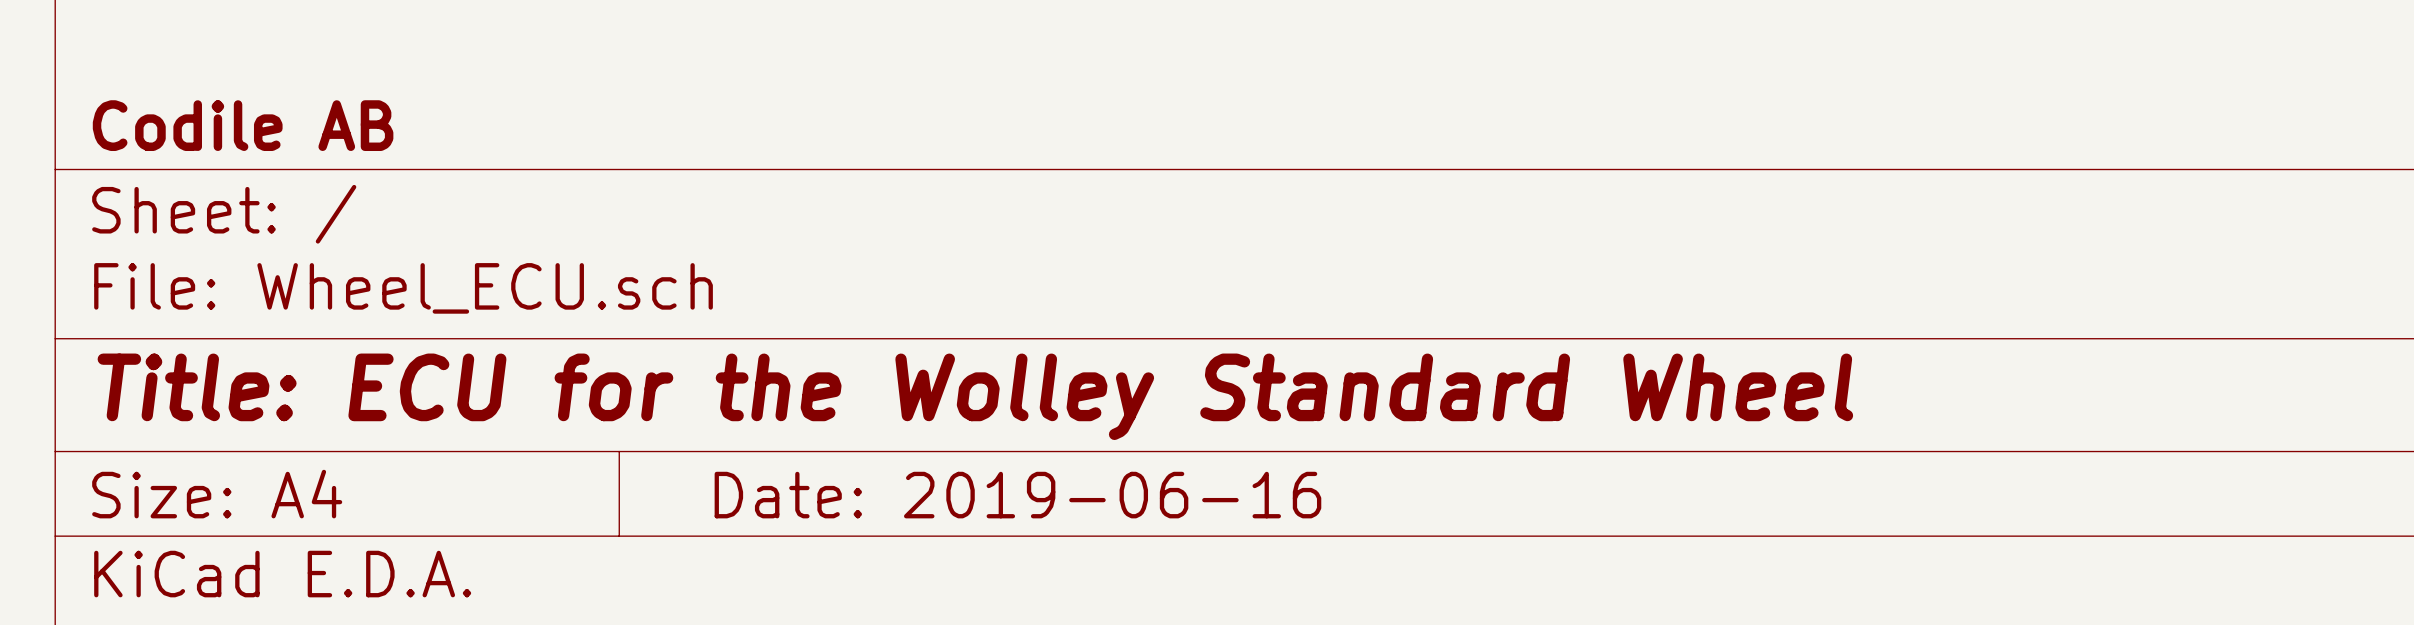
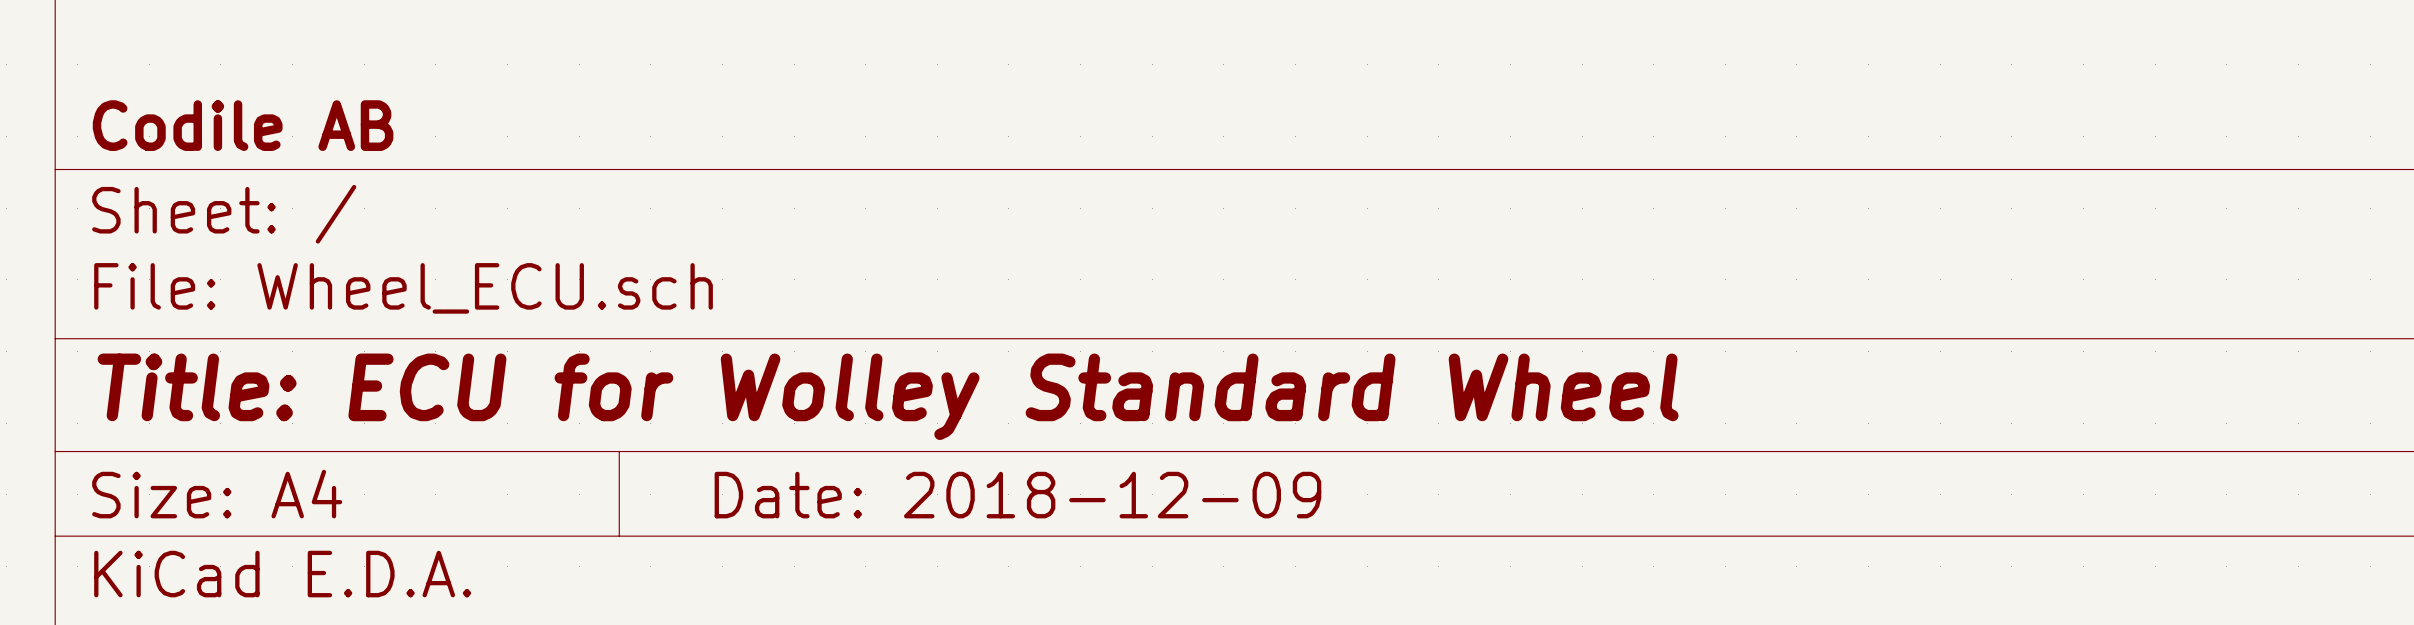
title block: Title: ECU for the Wolley Standard Wheel (975, 396) -> Title: ECU for Wolley Standard Wheel (888, 396)
title block: Date: 2019-06-16 (1017, 495) -> Date: 2018-12-09 (1017, 495)

